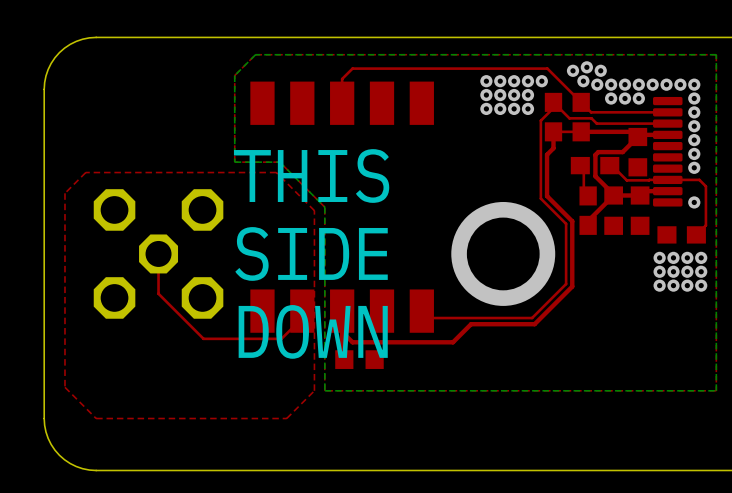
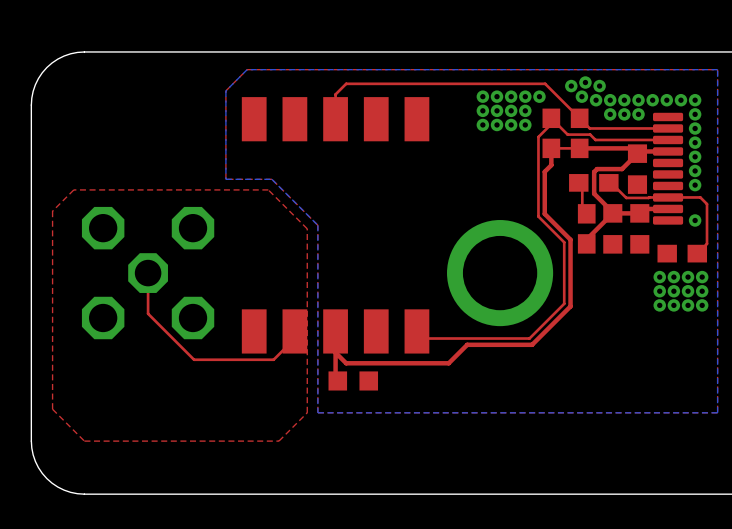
text: THIS (311, 176) -> none
text: SIDE (311, 253) -> none
text: DOWN (313, 331) -> none

